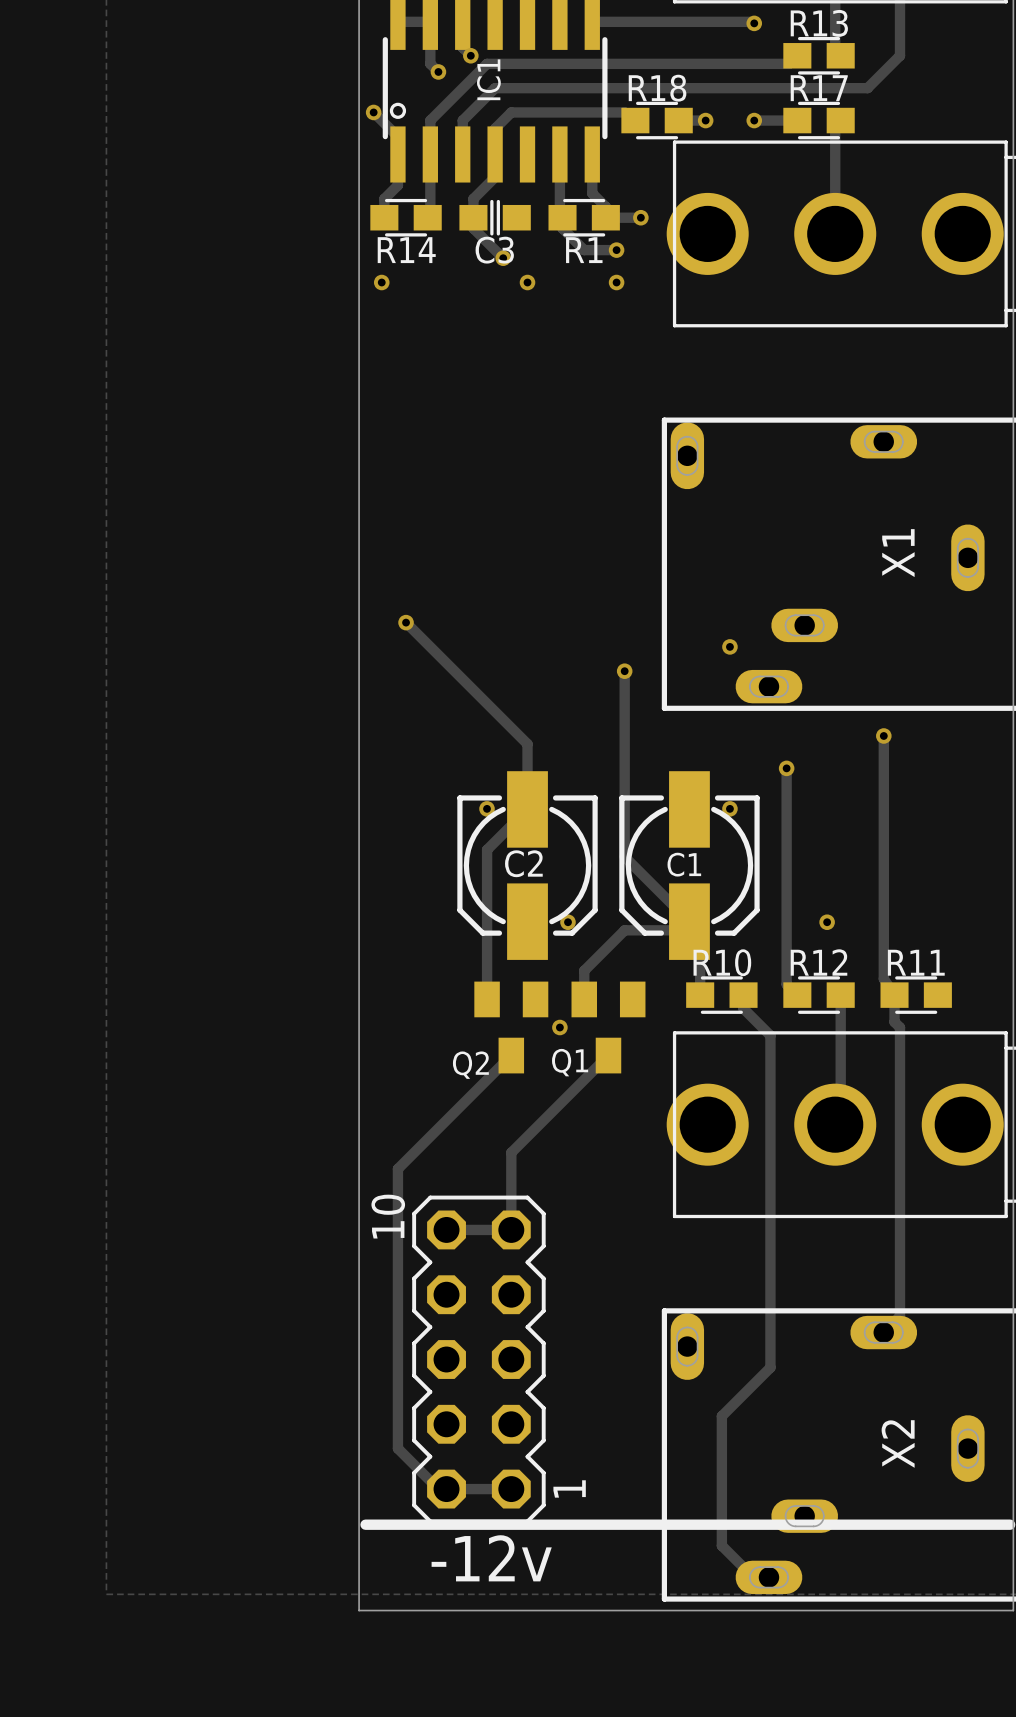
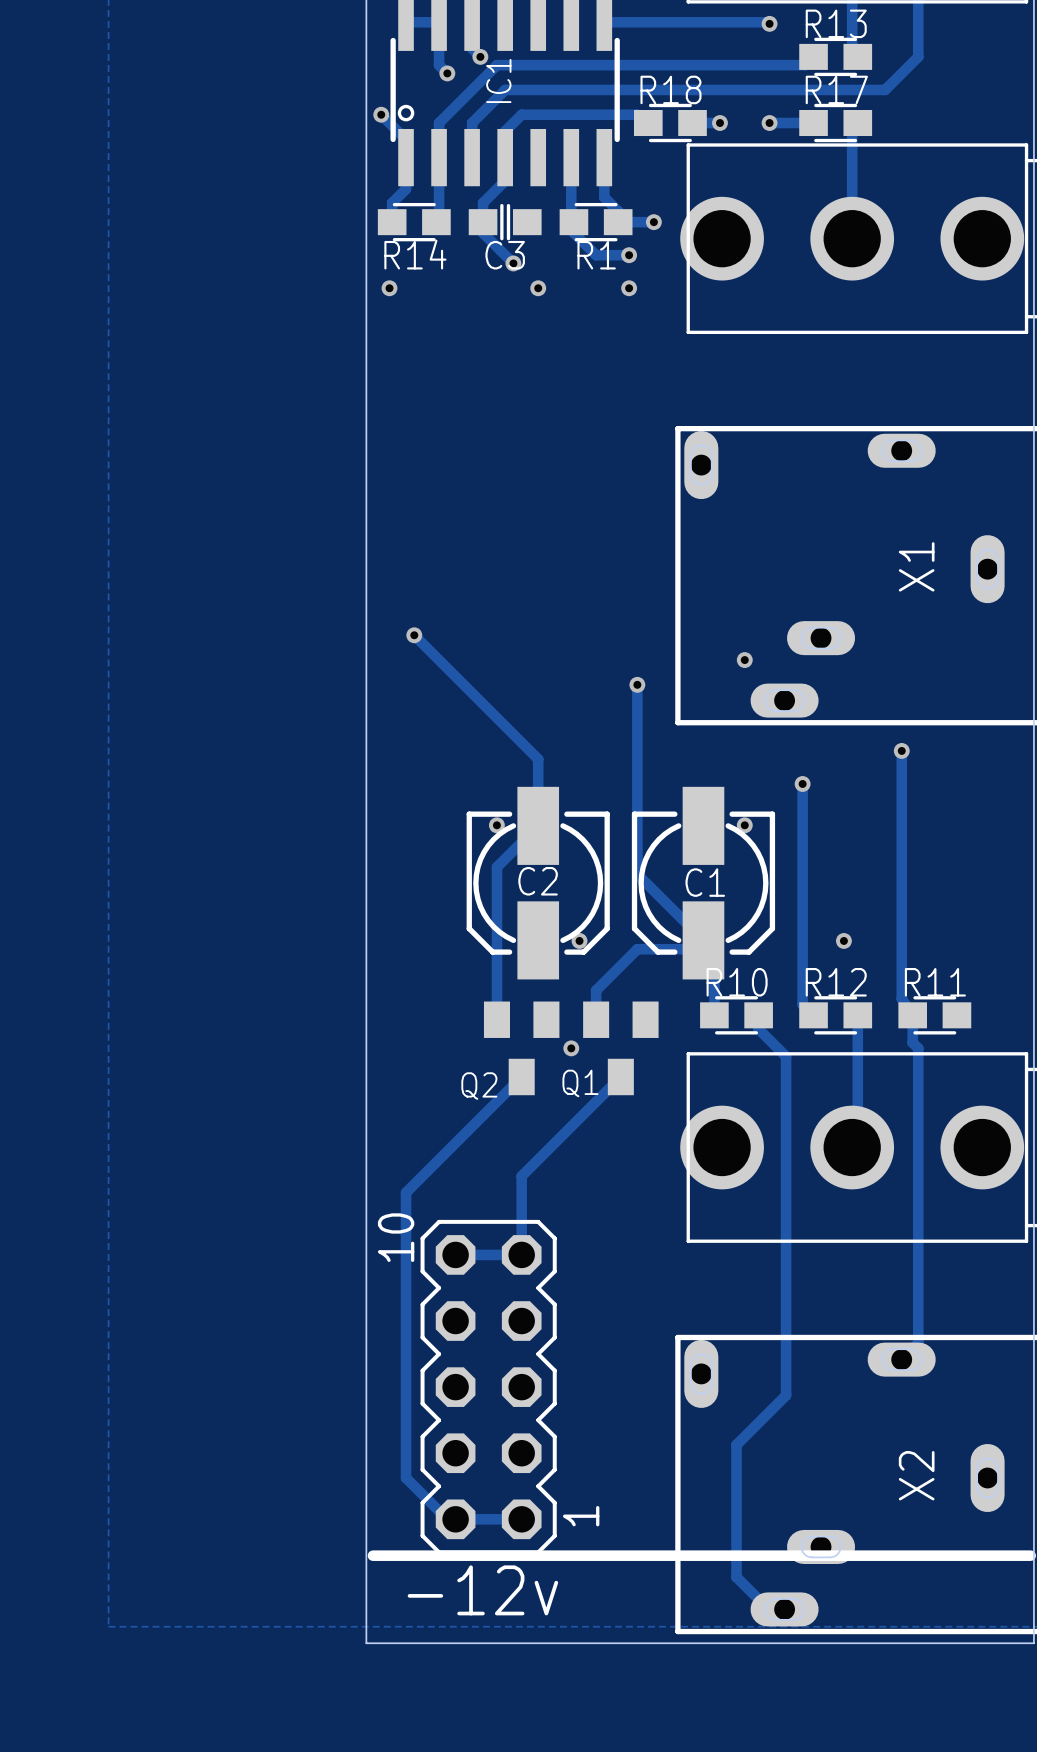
C1 name position: C1 (684, 864) -> C1 (705, 882)

